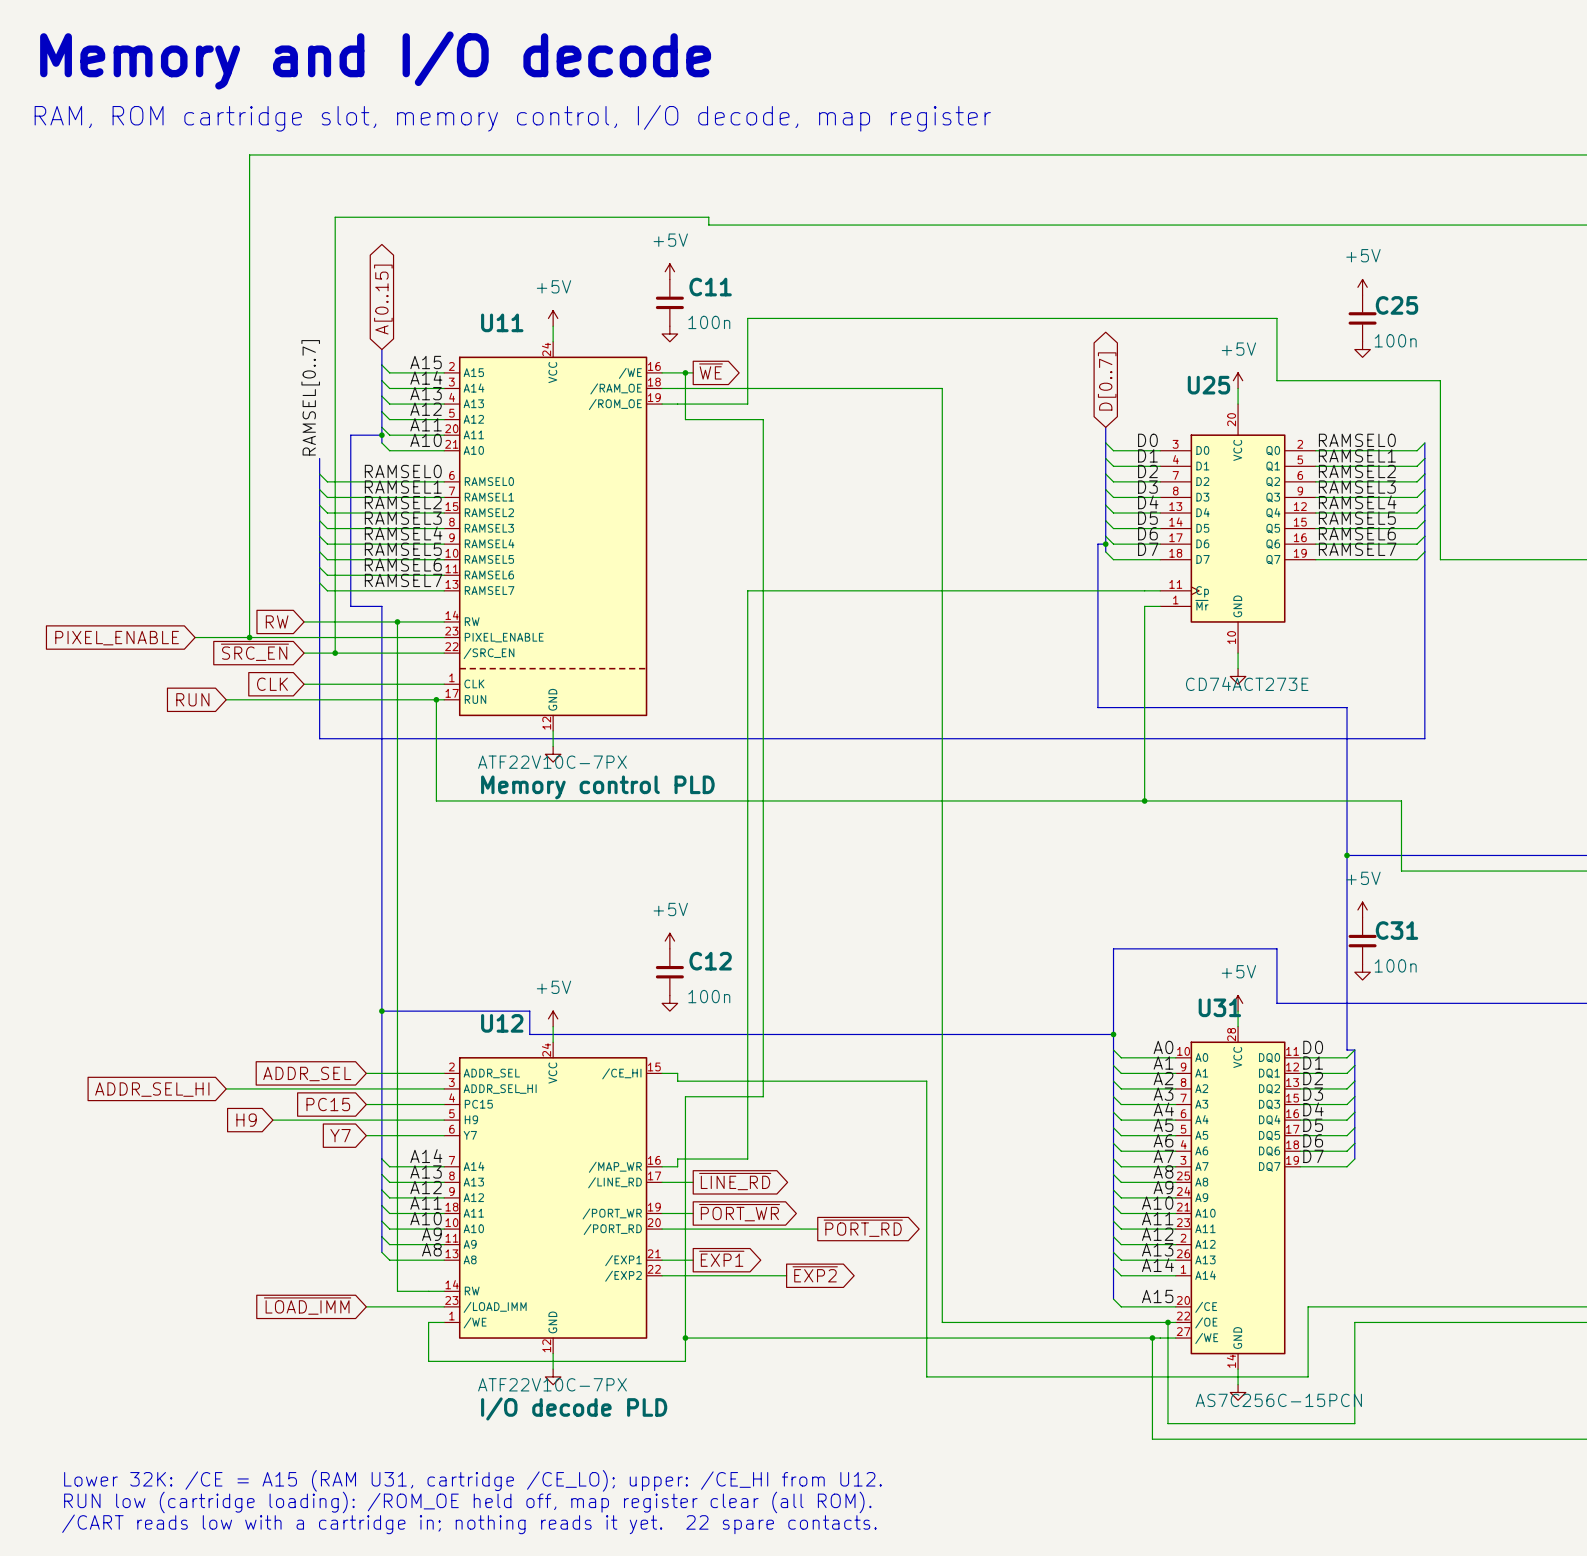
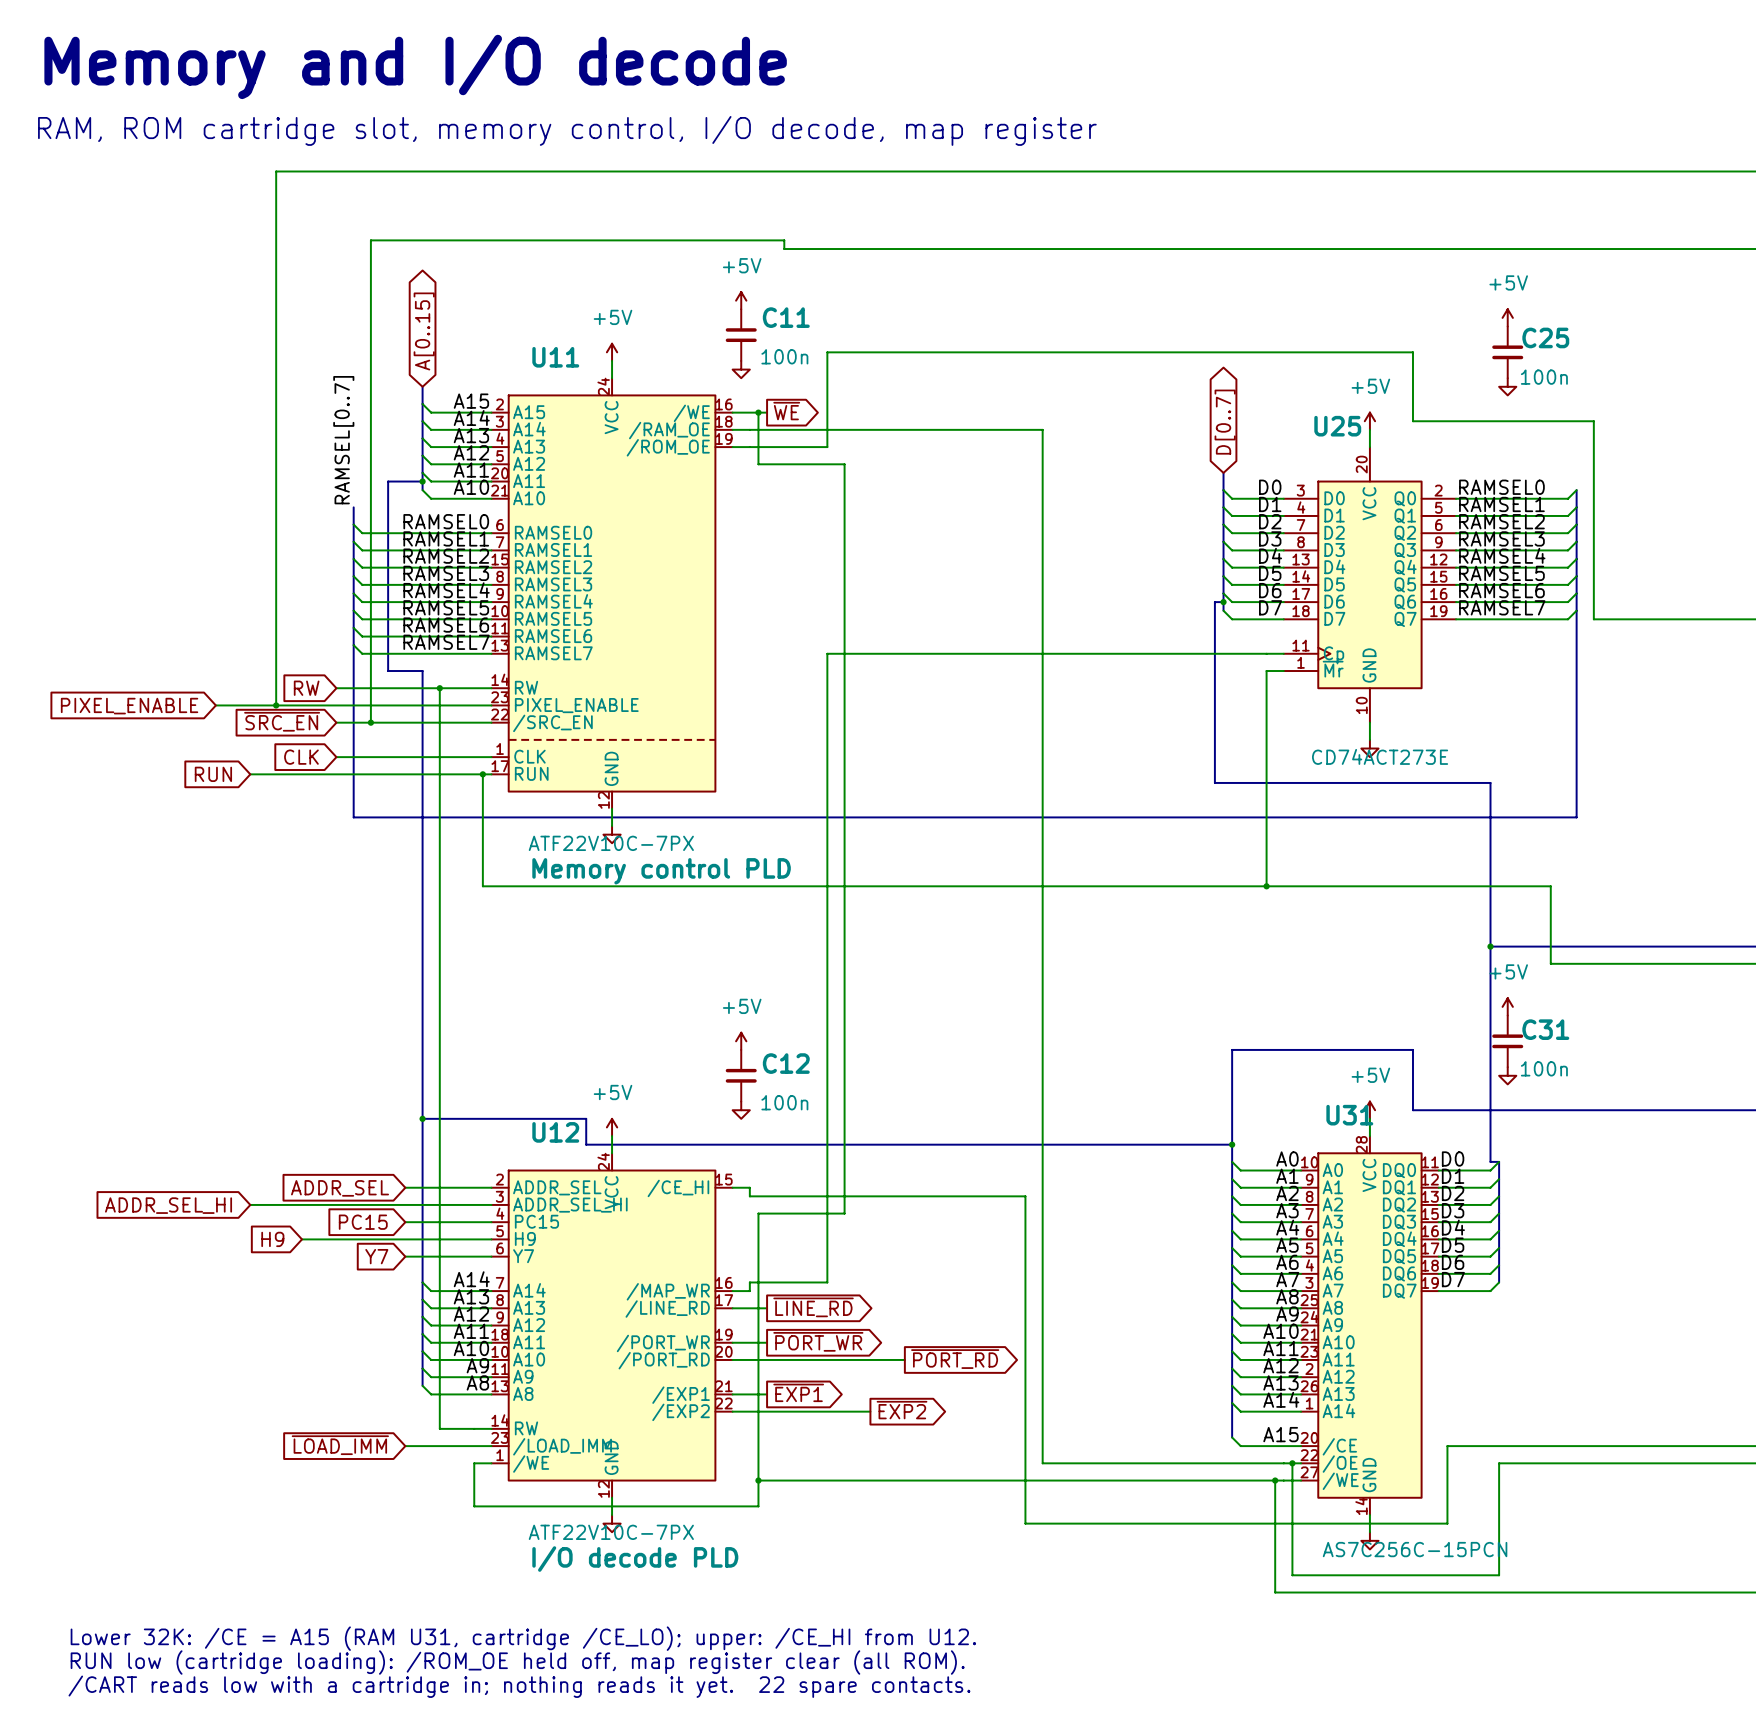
U11 symbol: [444, 341, 663, 731] -> [491, 378, 733, 809]
U25 symbol: [1160, 404, 1316, 654] -> [1283, 447, 1457, 723]
U31 symbol: [1175, 1026, 1301, 1370] -> [1301, 1136, 1439, 1516]
U12 symbol: [444, 1042, 663, 1354] -> [491, 1153, 733, 1498]

